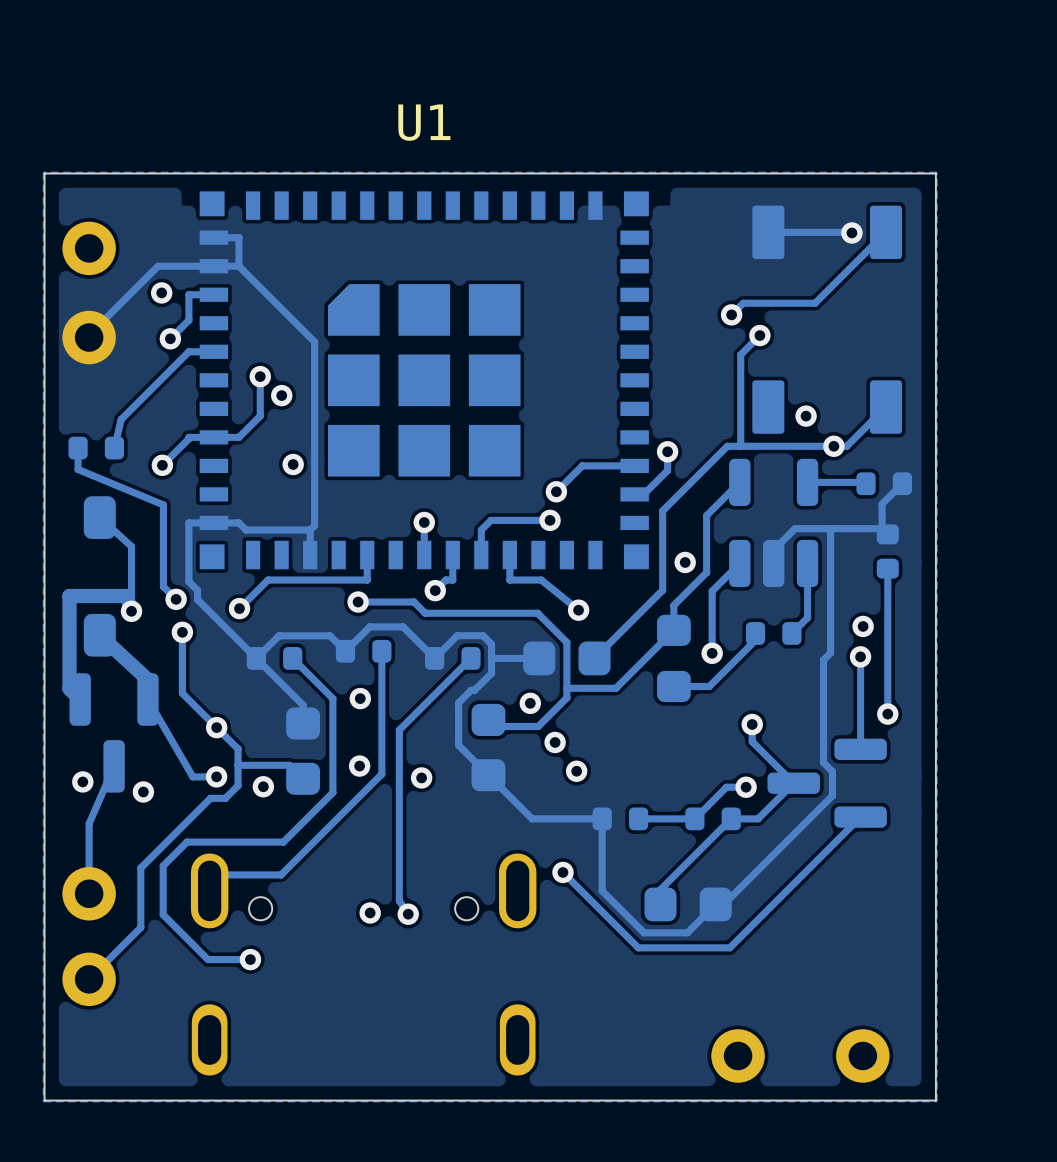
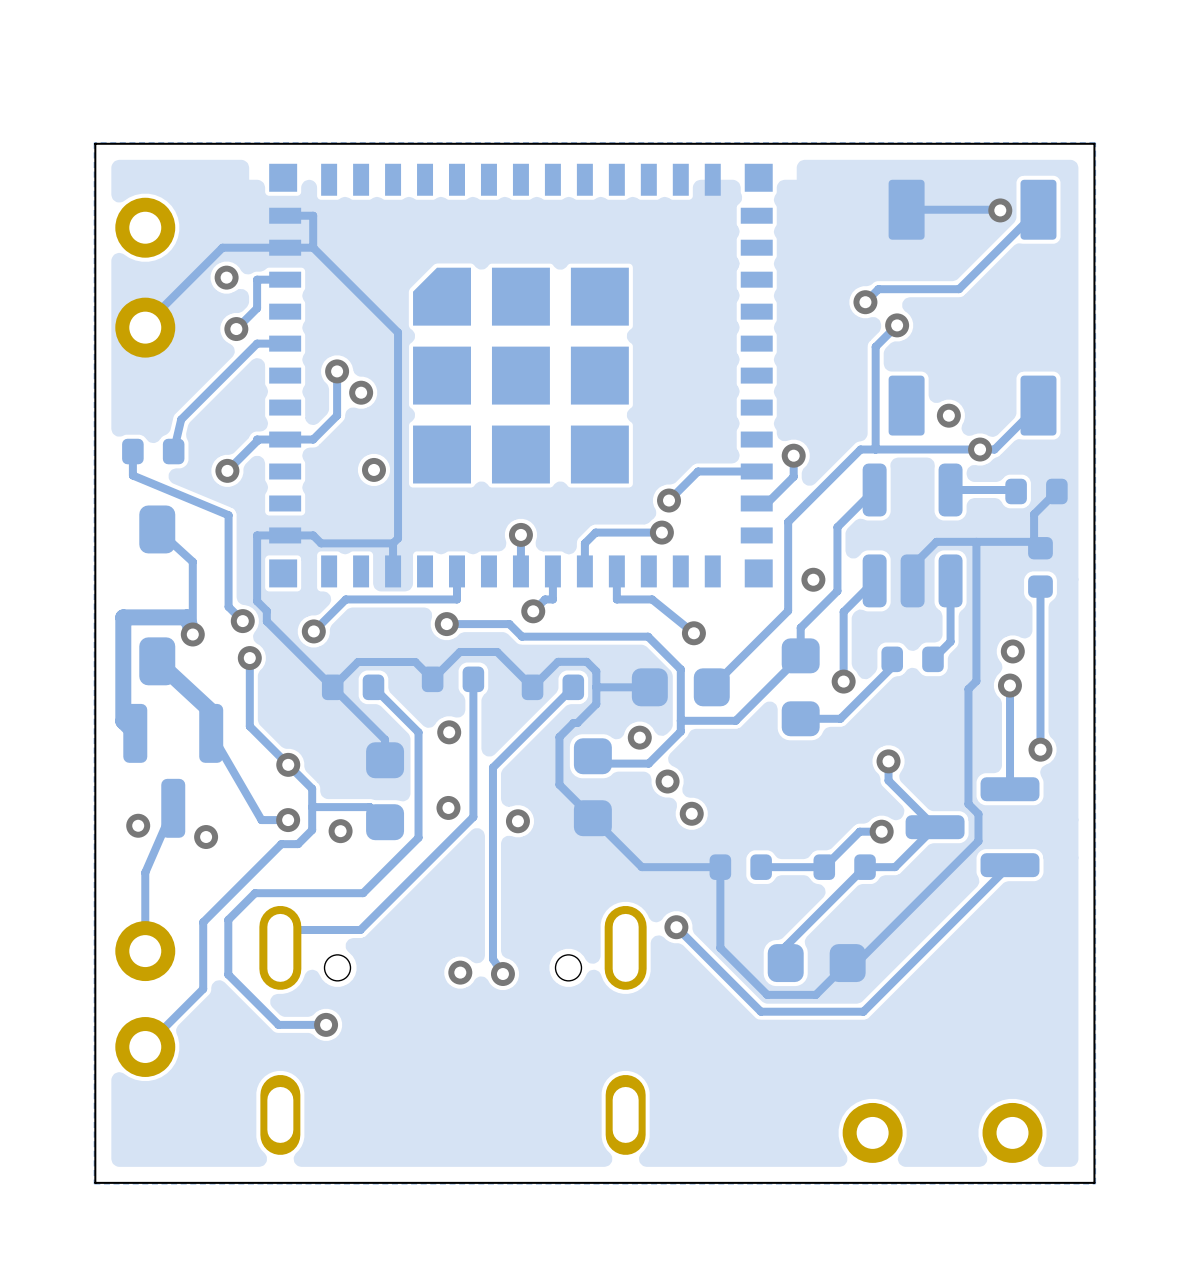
U1 name: U1 (424, 122) -> none

